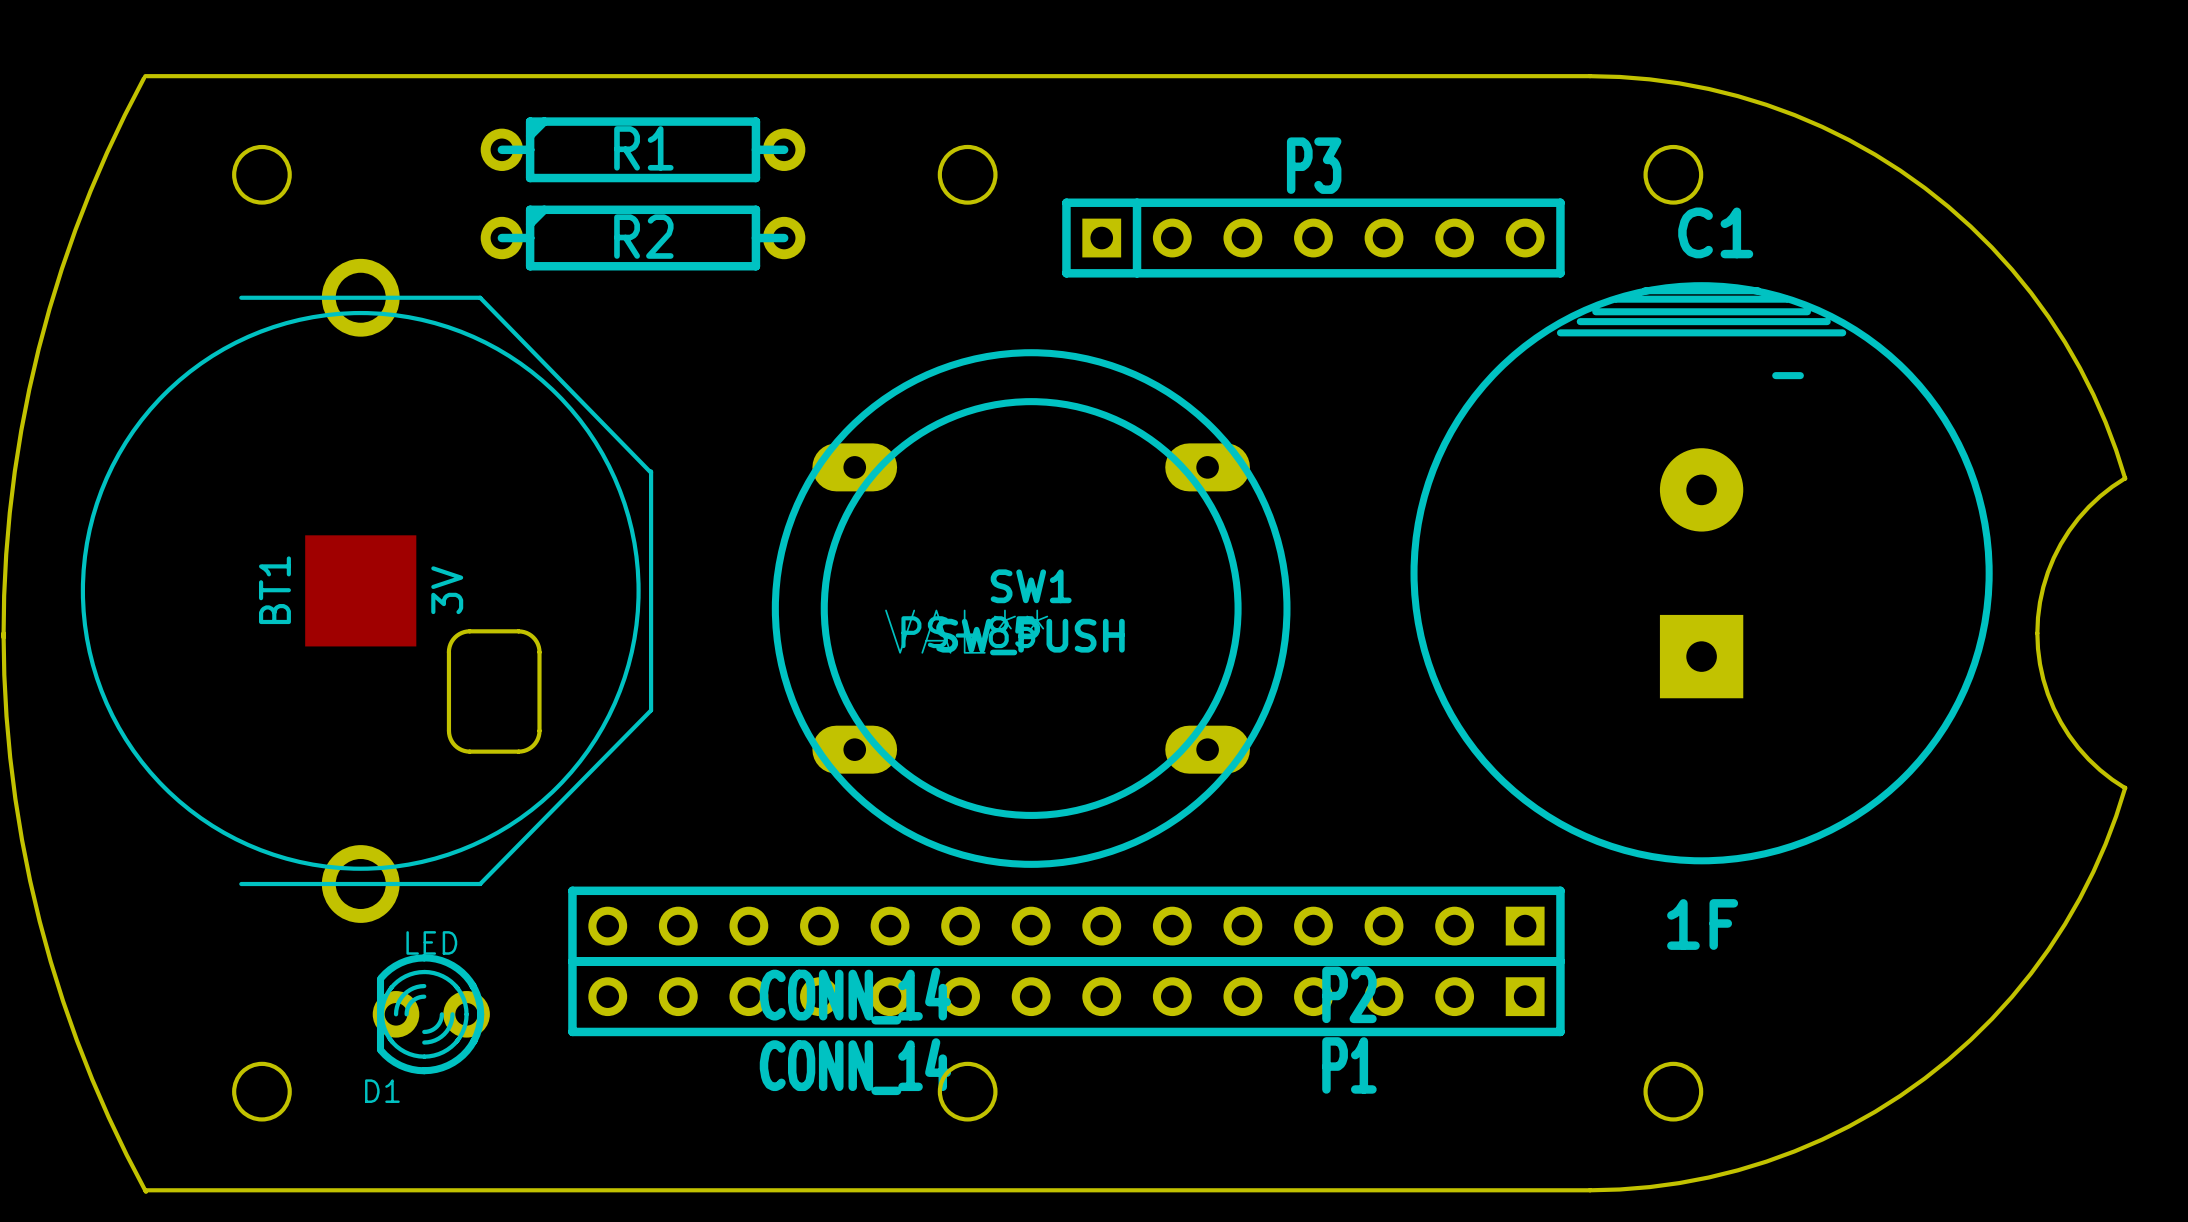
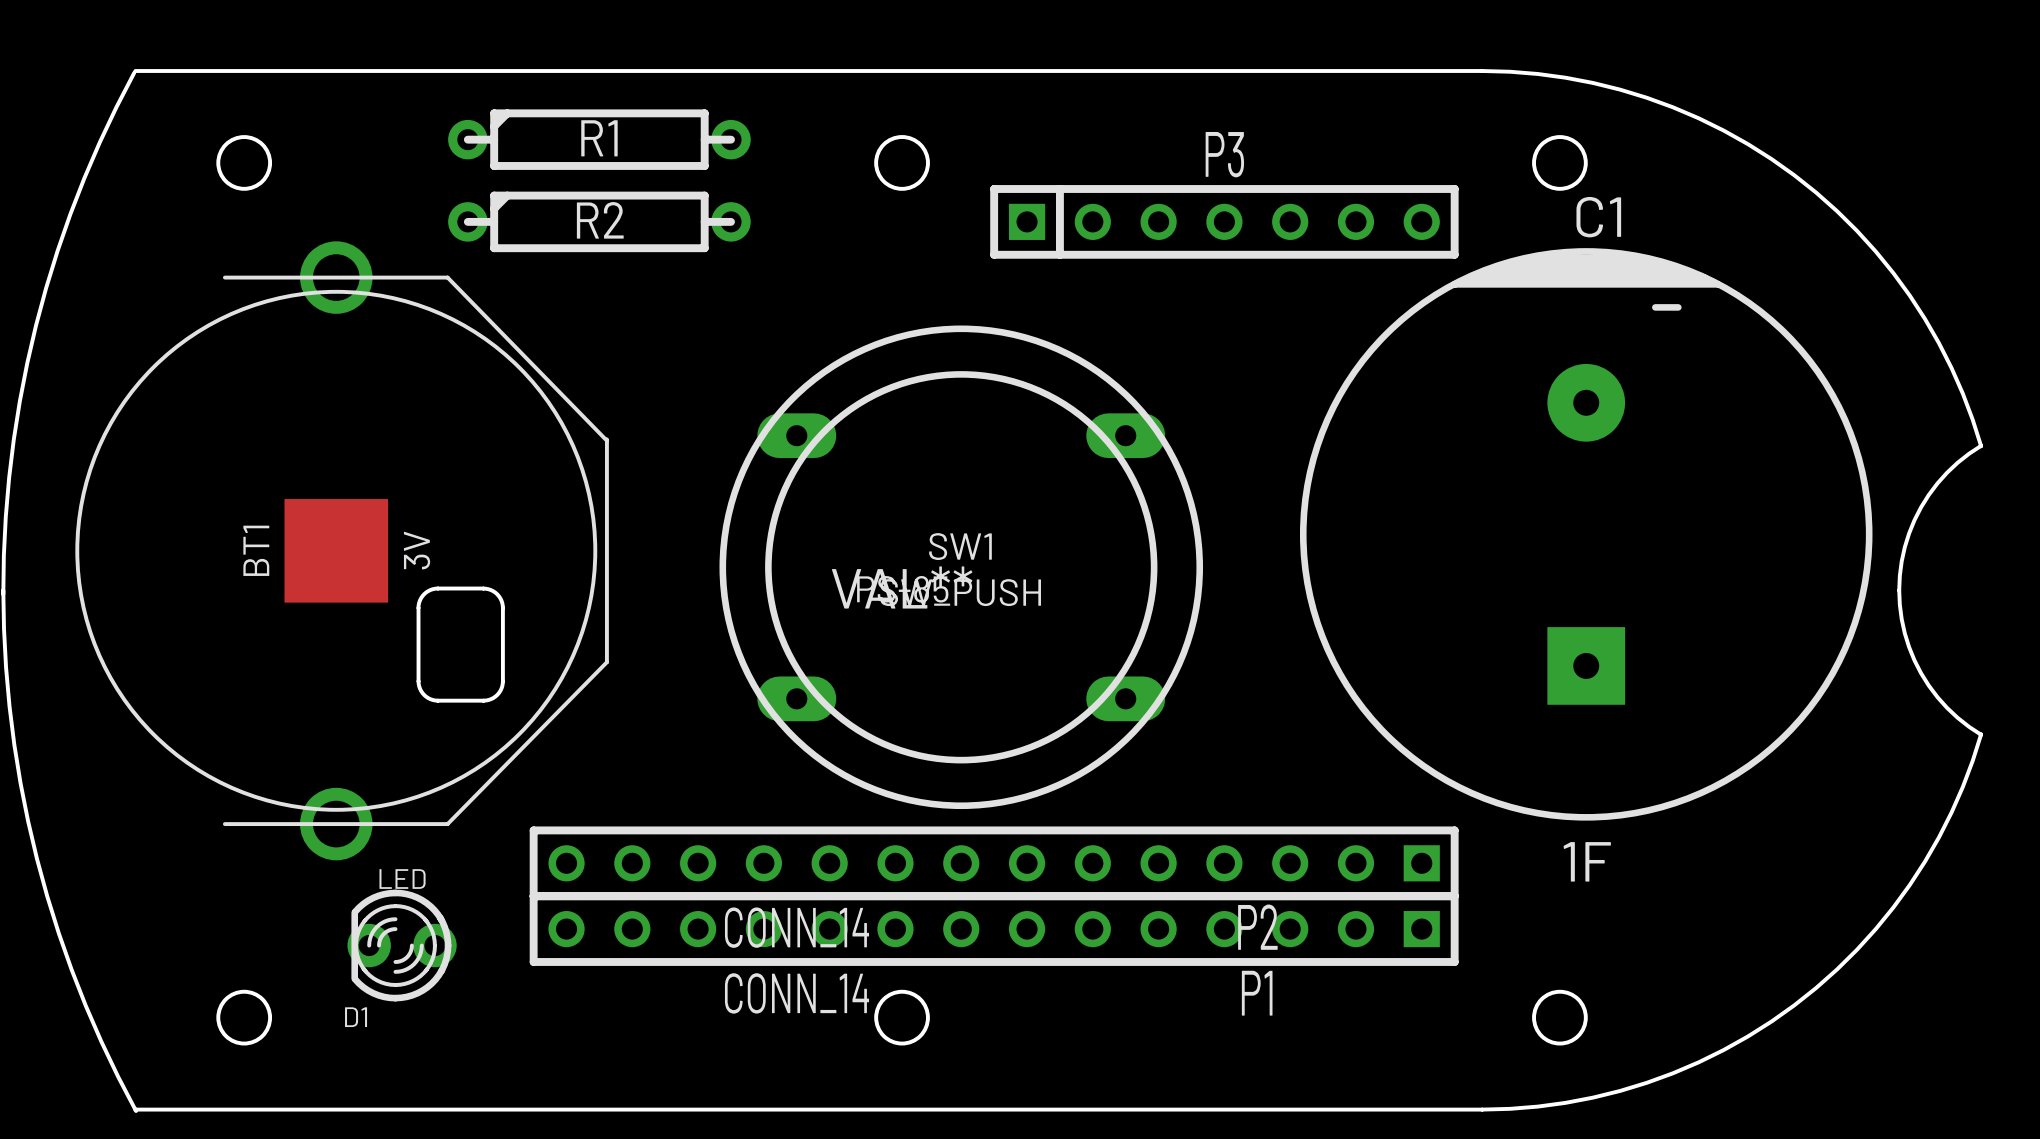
C1 footprint: [1410, 282, 1993, 865] -> [1299, 248, 1873, 821]

